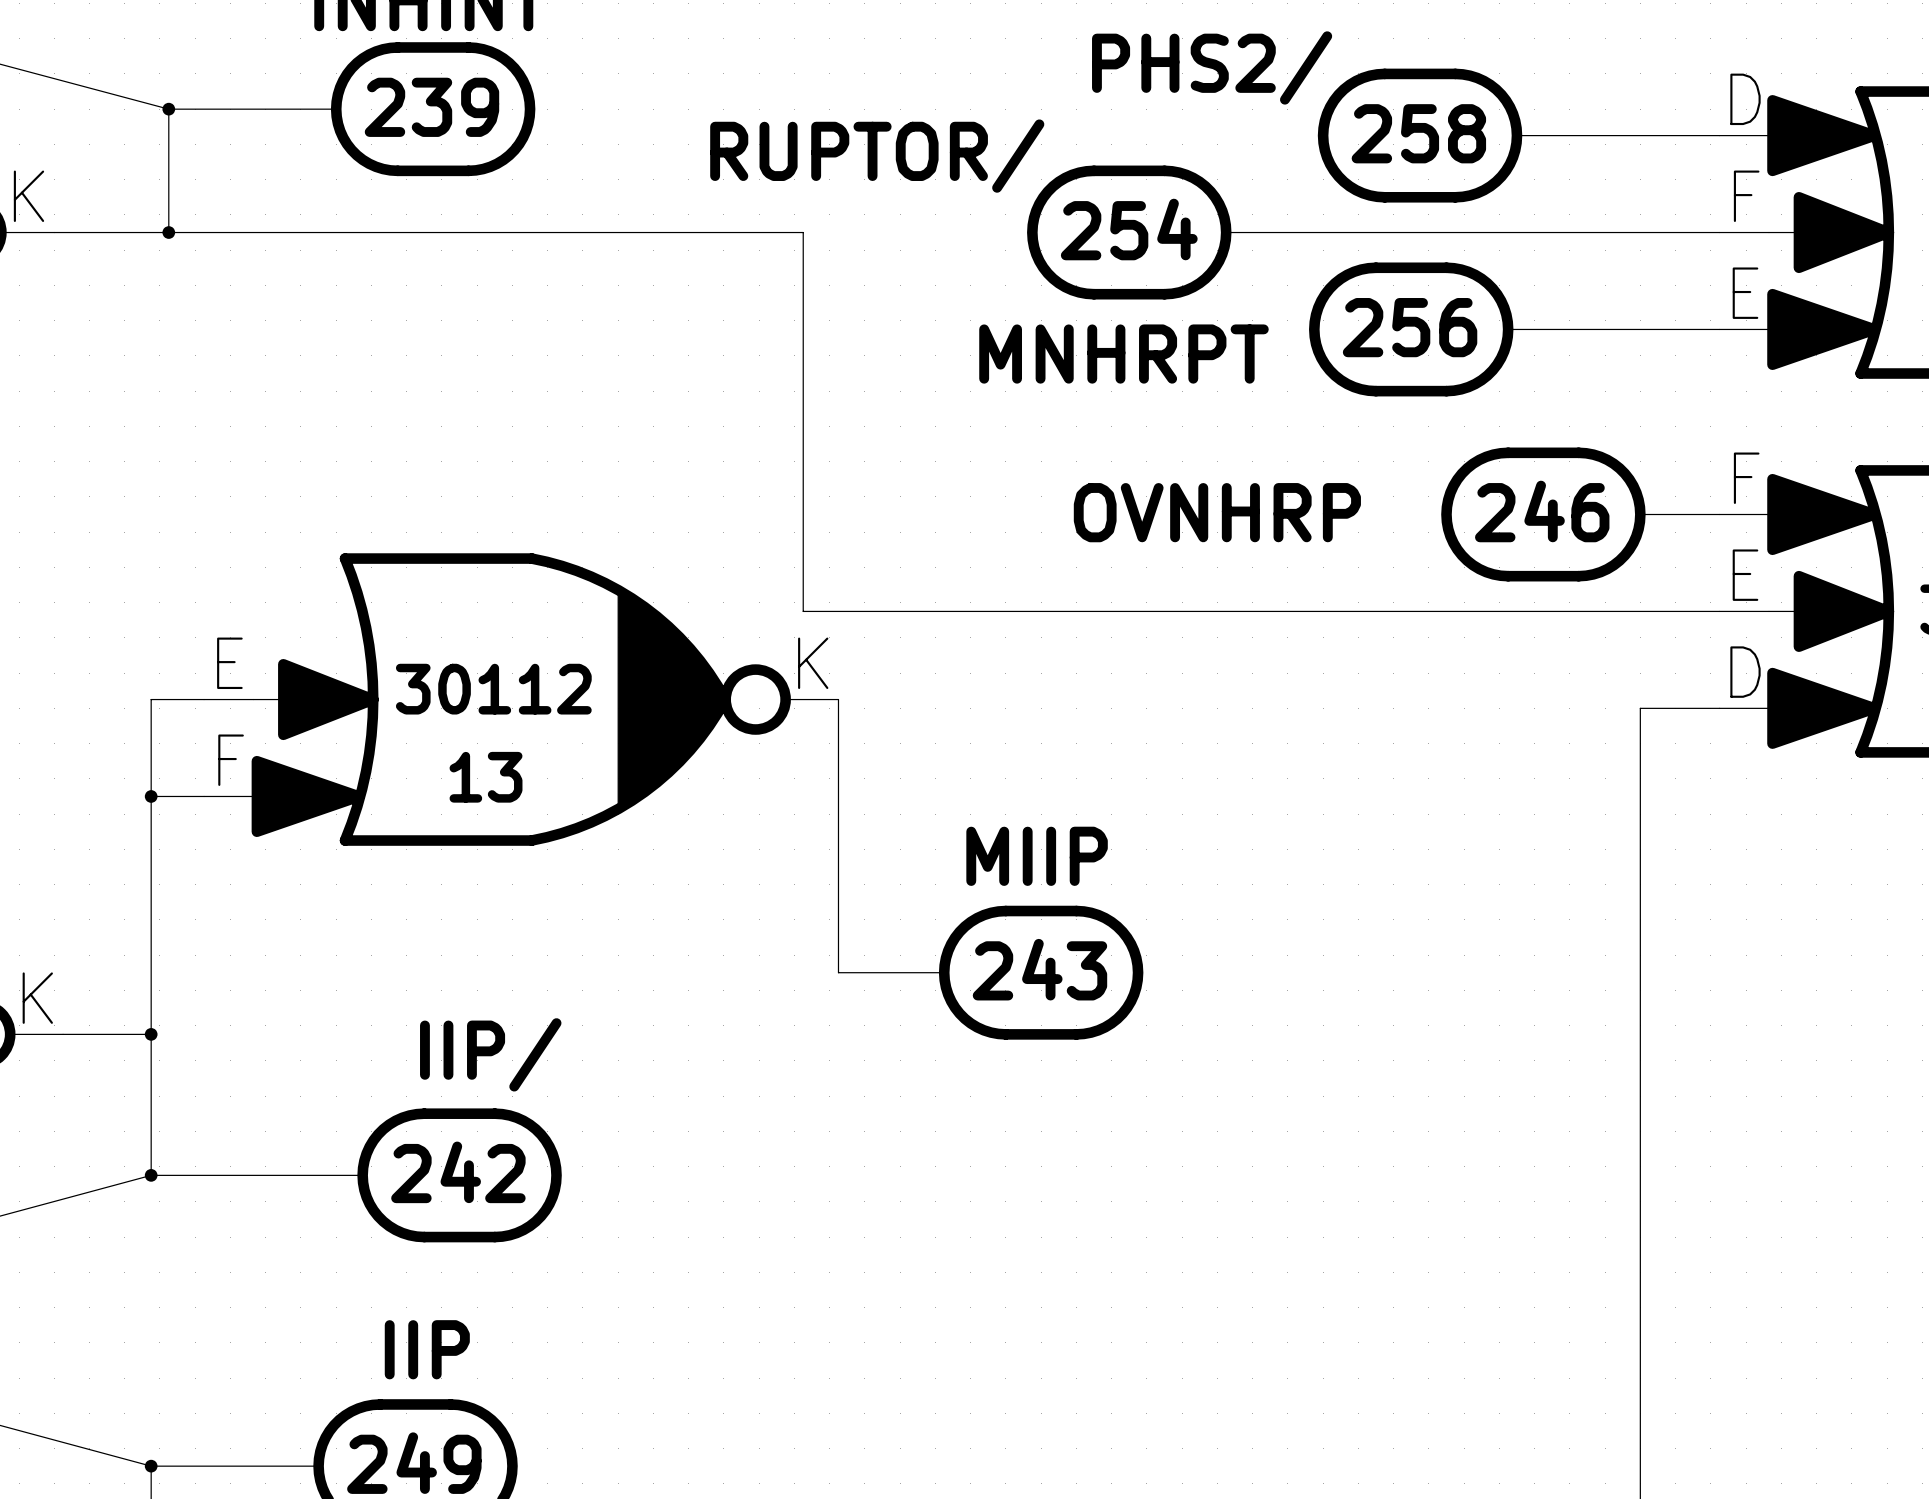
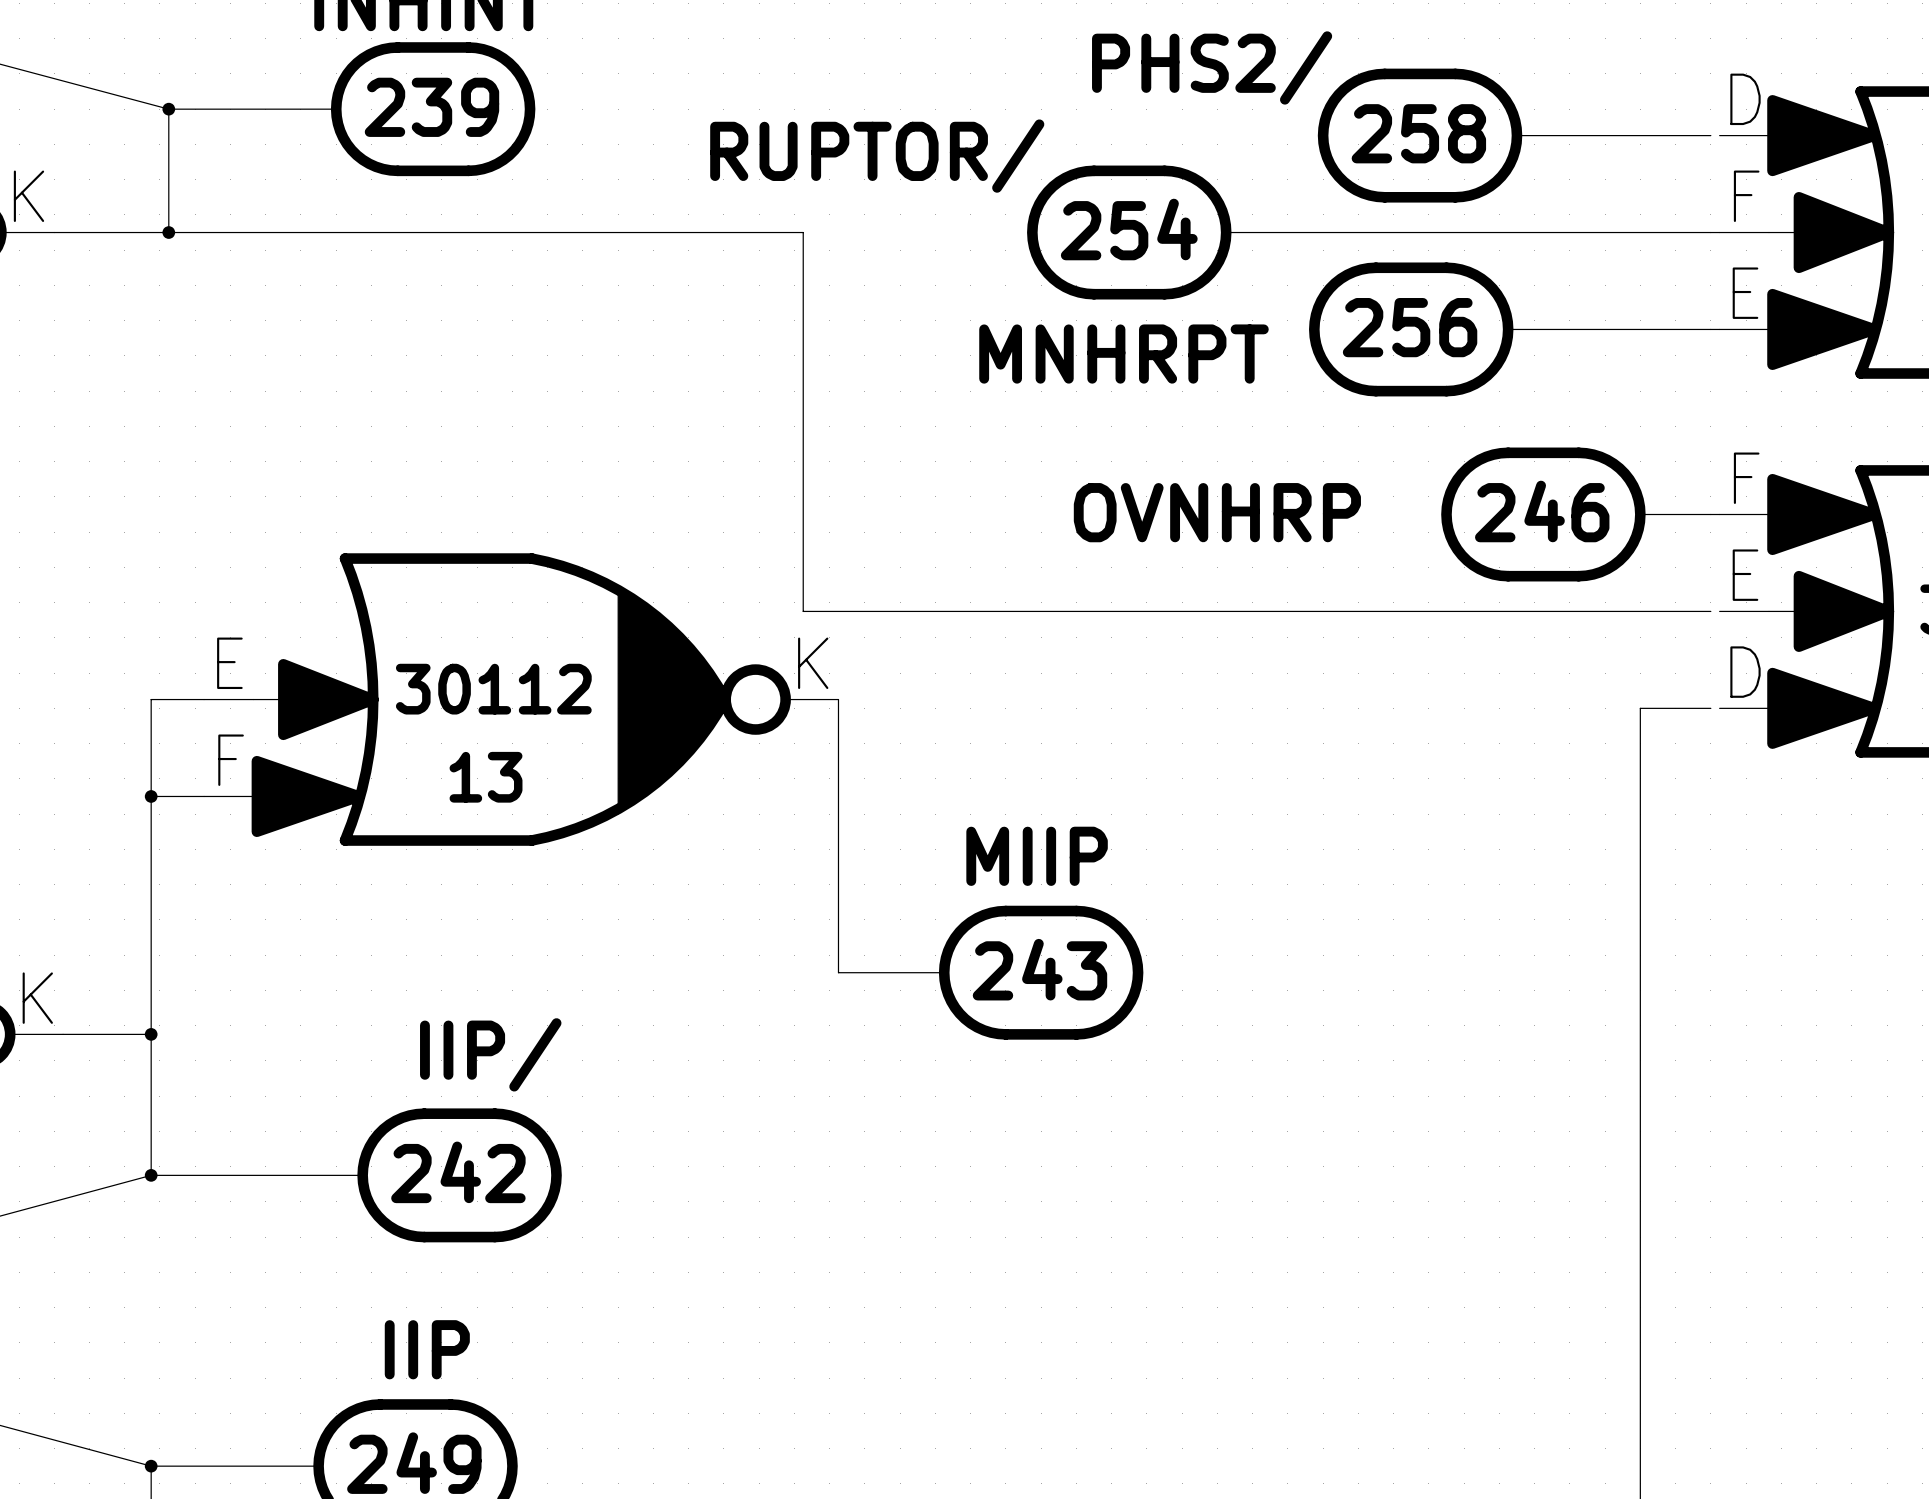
wire: (1710, 135) (1719, 135) -> none
wire: (1710, 611) (1719, 611) -> none
wire: (1710, 708) (1719, 708) -> none

